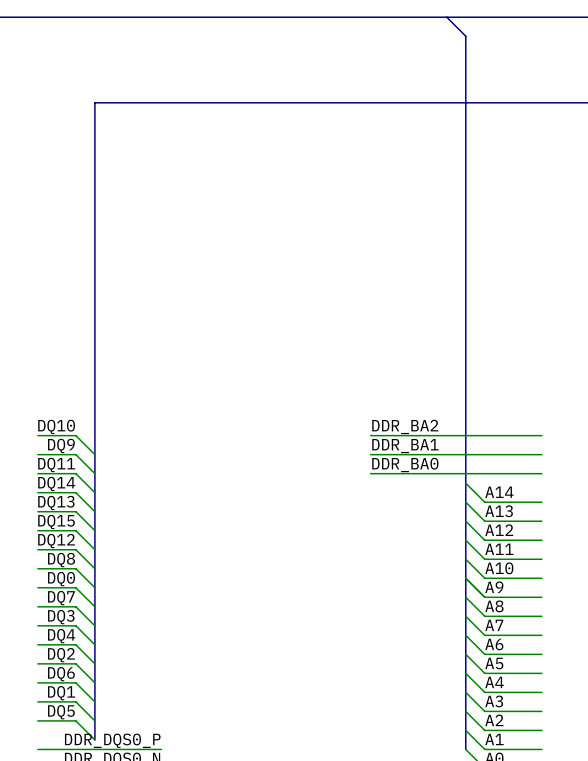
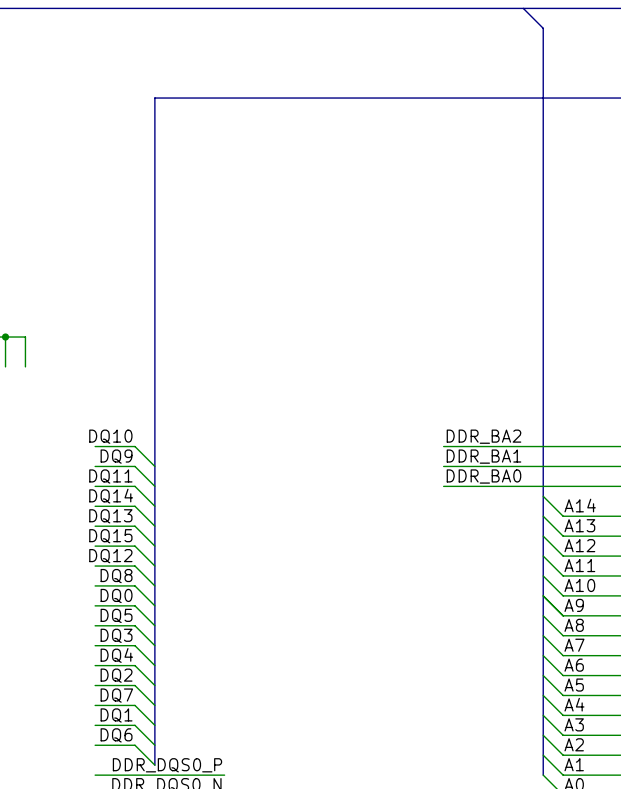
label: DQ7 (61, 598) -> DQ5 (116, 615)
label: DQ6 (61, 674) -> DQ7 (116, 695)
label: DQ5 (61, 712) -> DQ6 (116, 735)

